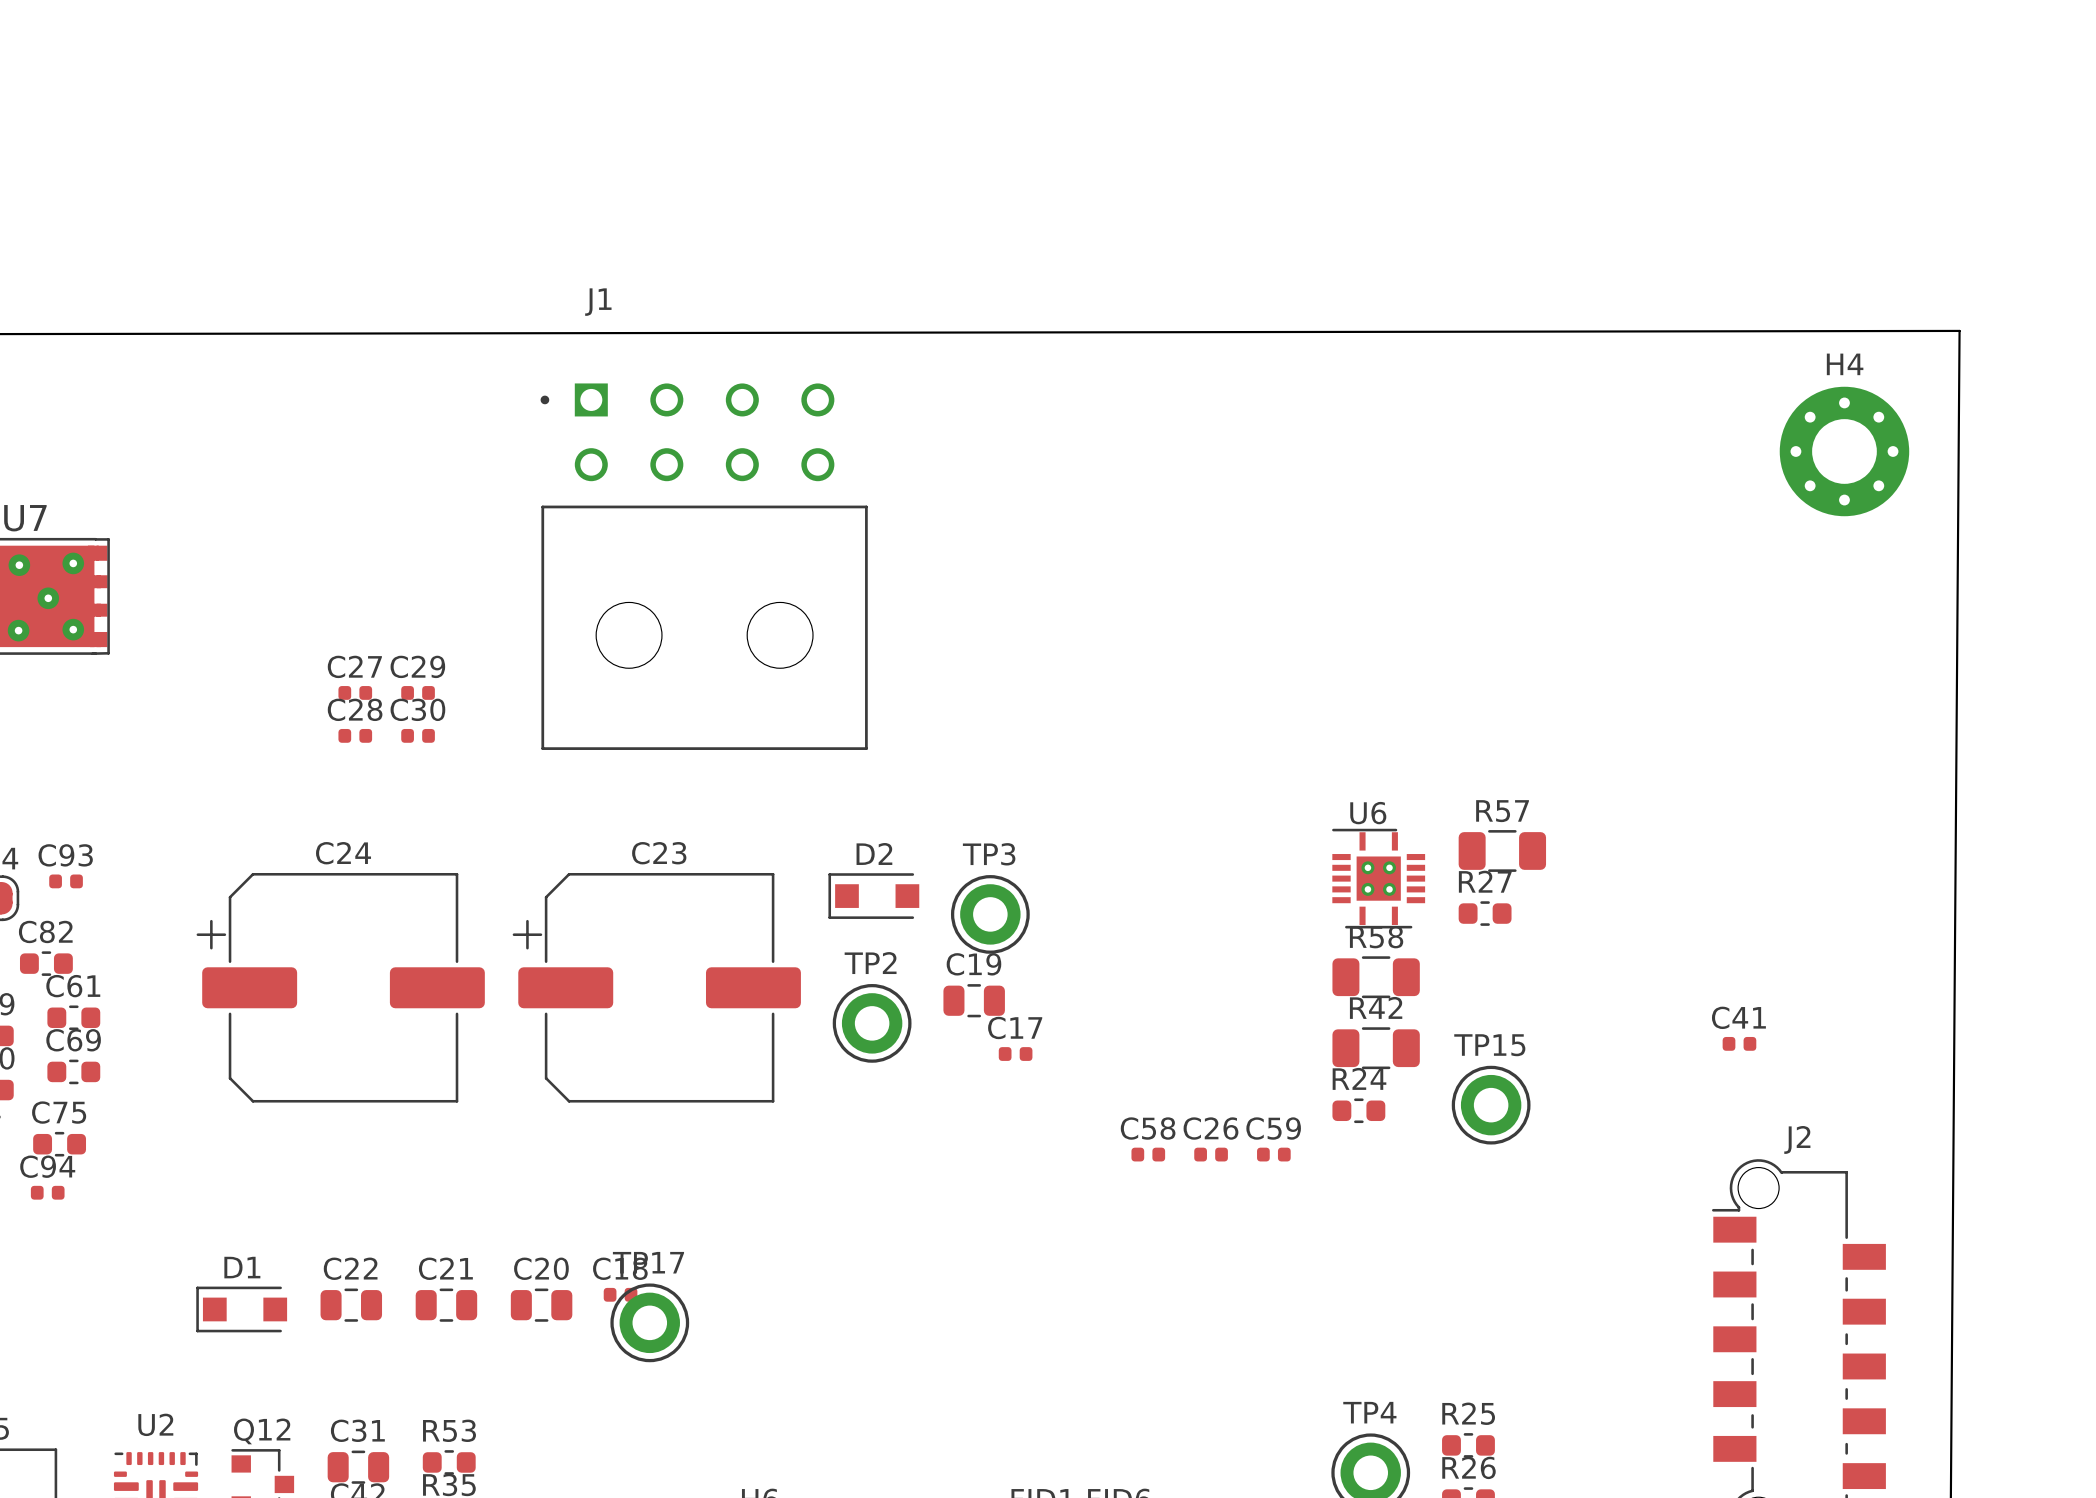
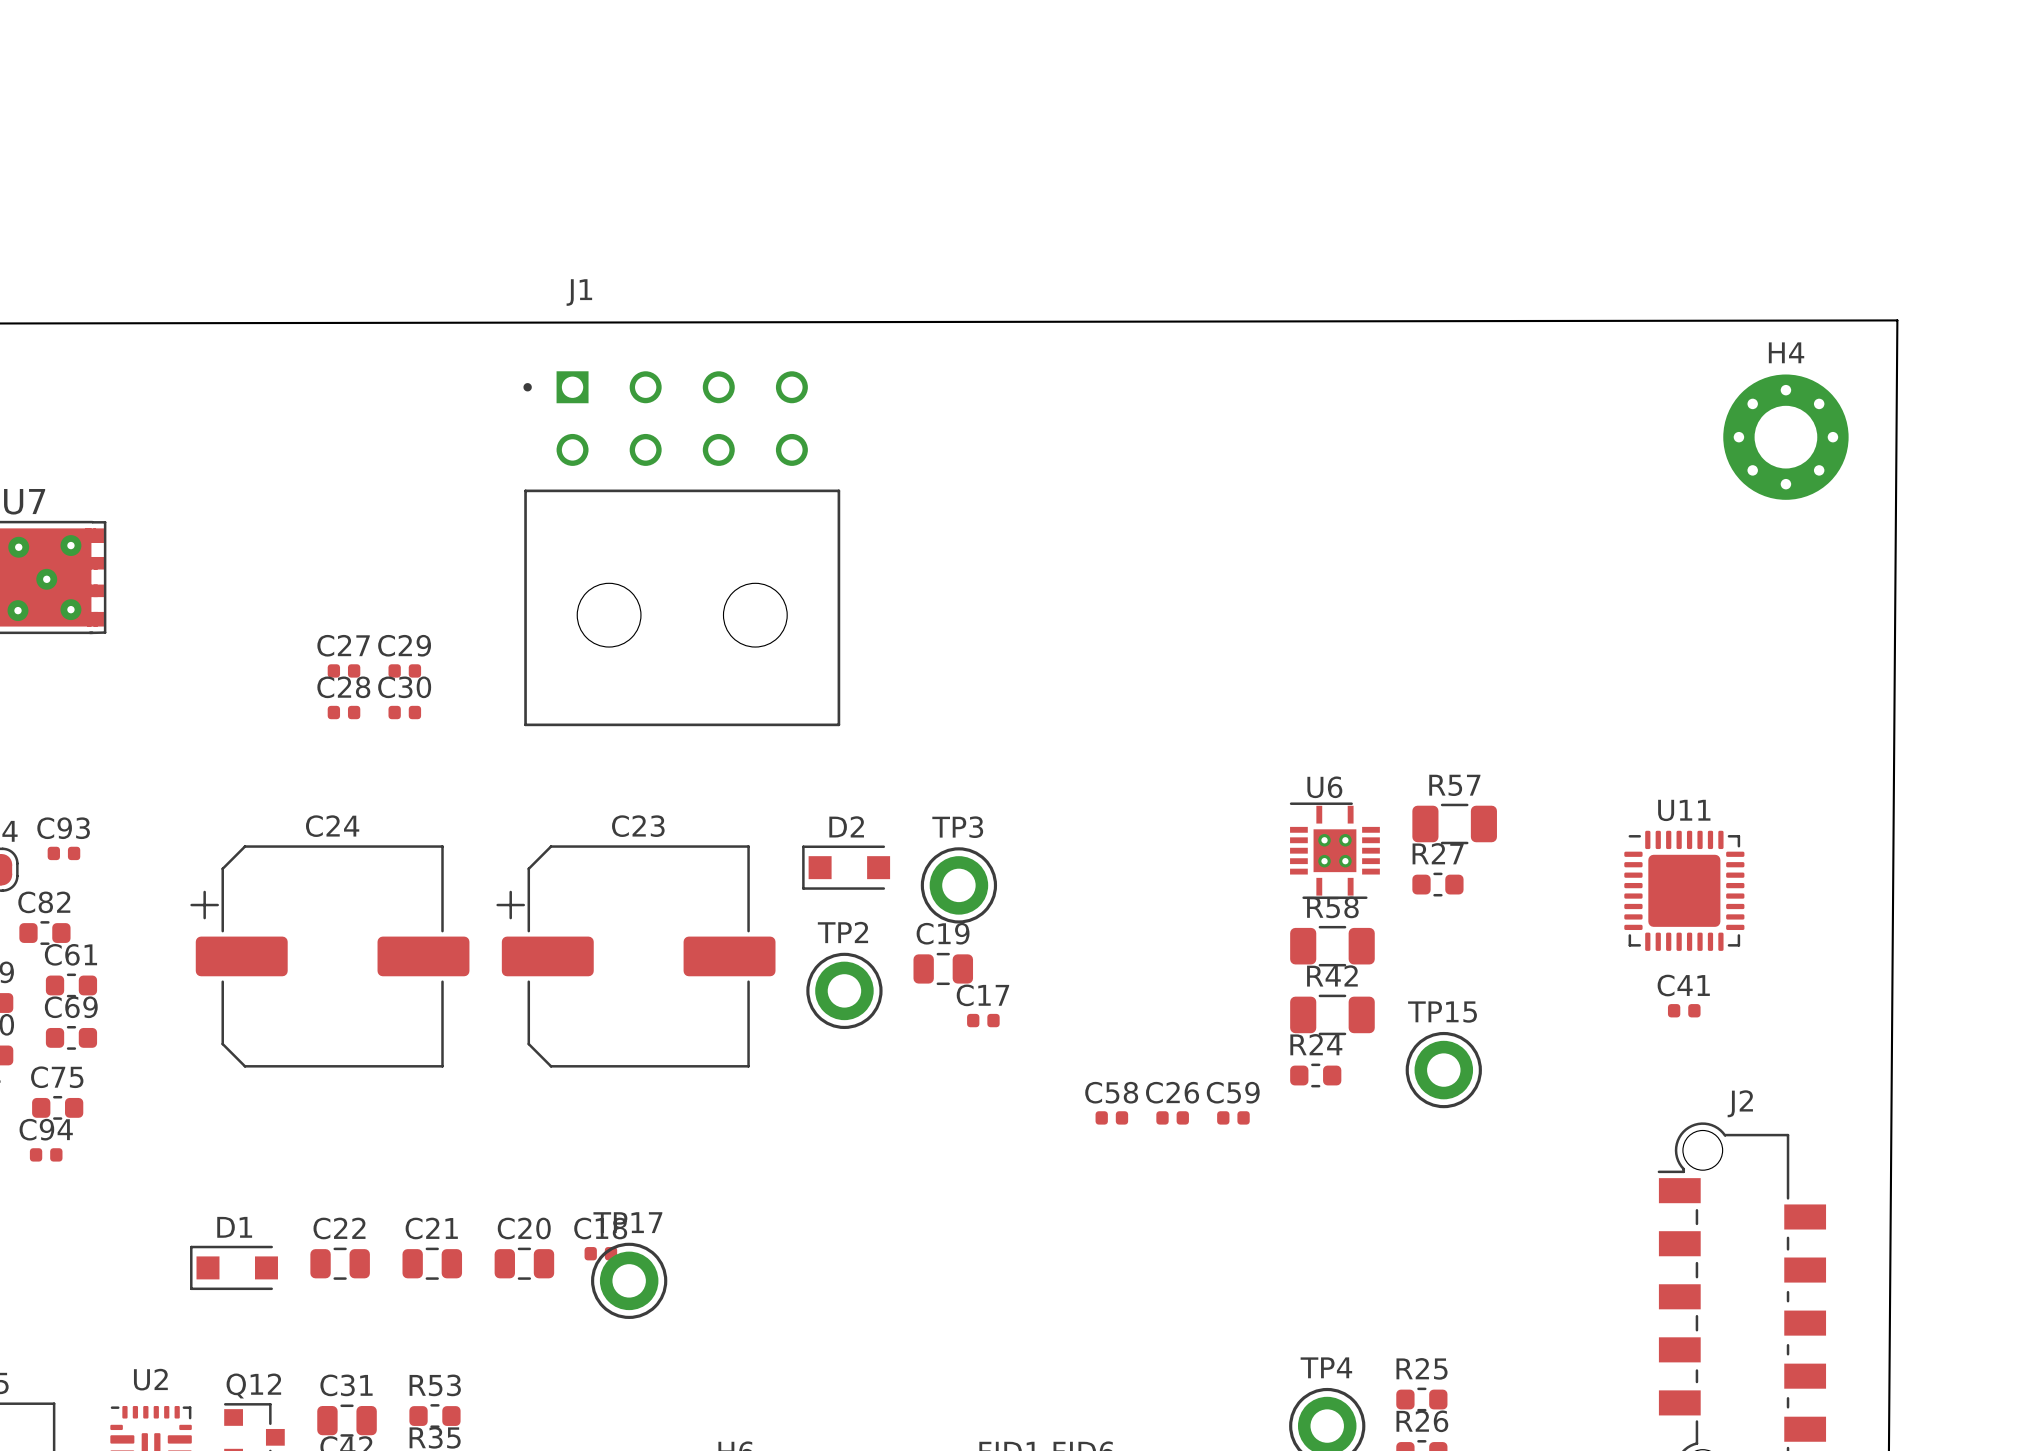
U11: none -> (1684, 890)

